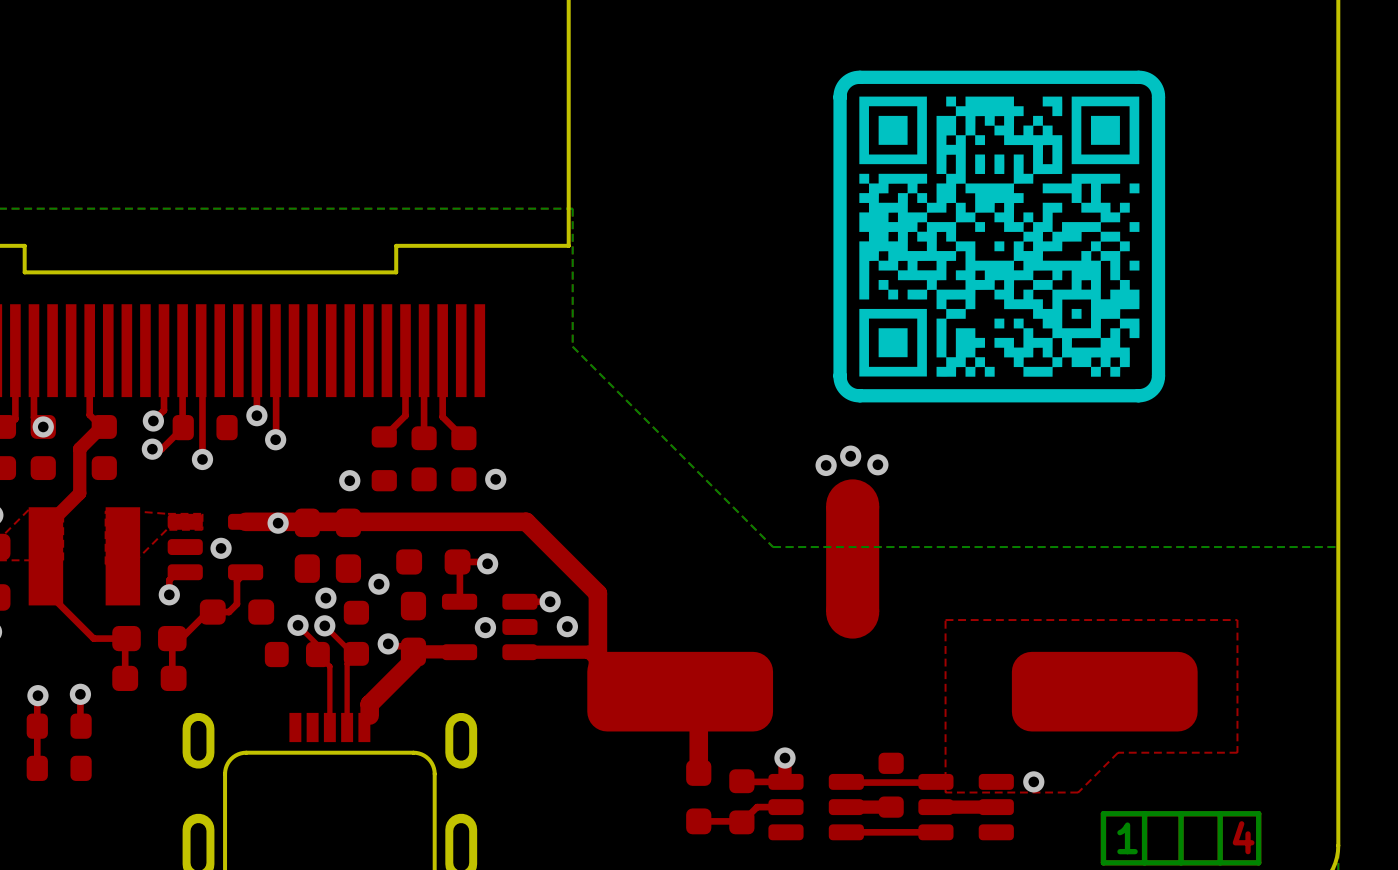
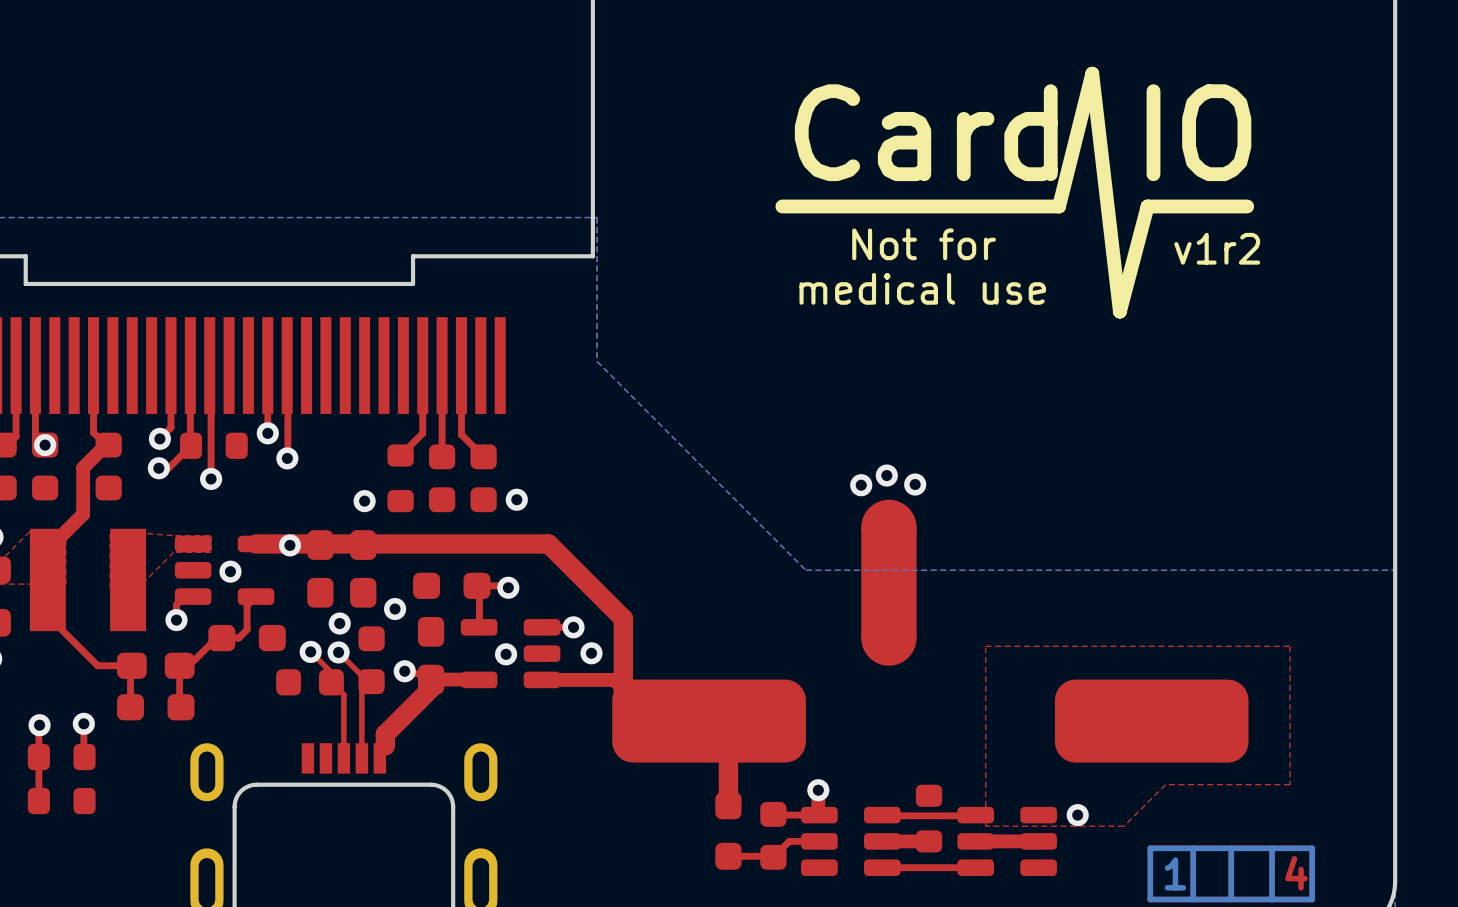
drawing: none -> [775, 66, 1255, 319]
drawing: [833, 70, 1166, 403] -> none
text: none -> Not for (924, 244)
text: none -> v1r2 (1217, 248)
text: none -> medical use (922, 288)

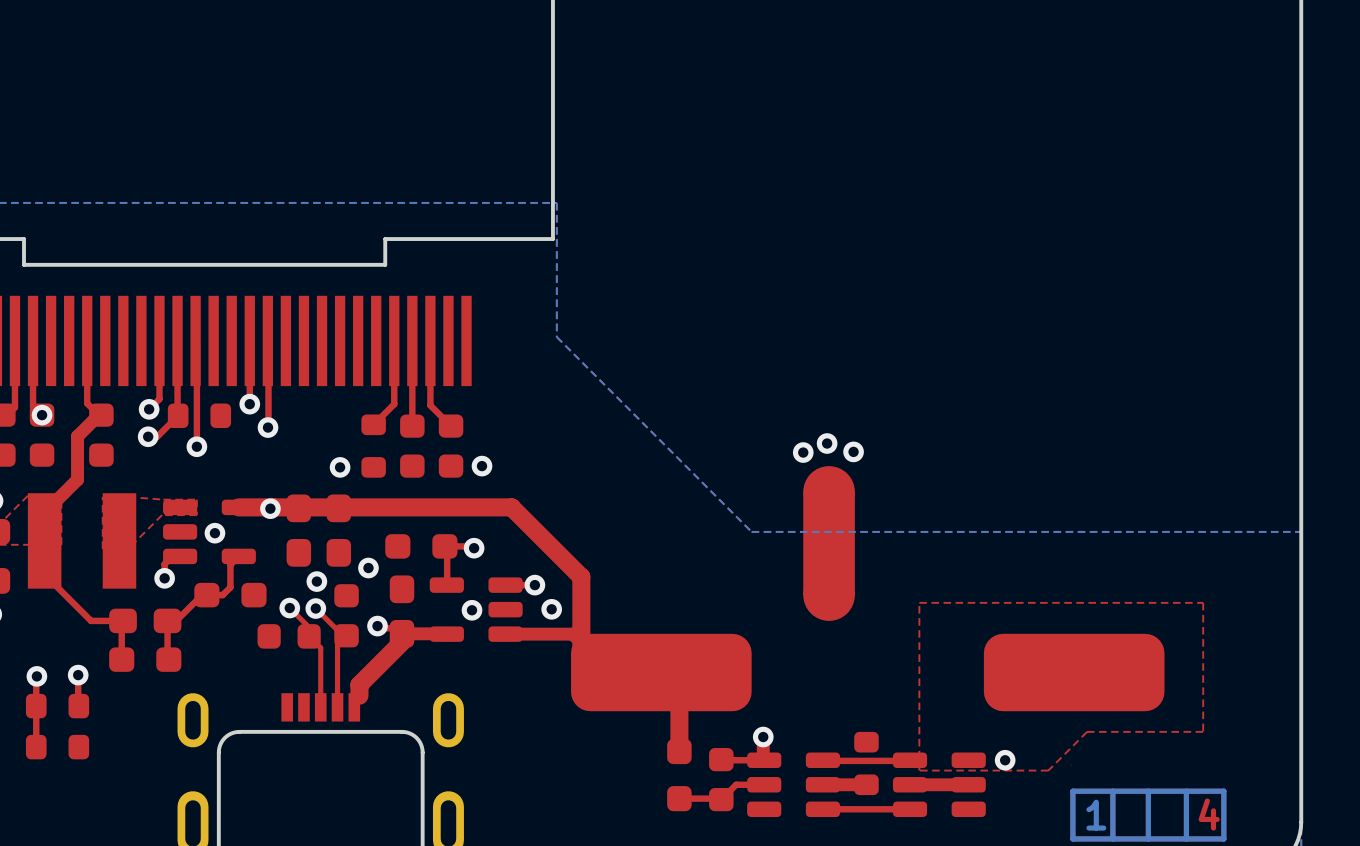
drawing: [775, 66, 1255, 319] -> none
text: Not for (924, 244) -> none
text: v1r2 (1217, 248) -> none
text: medical use (922, 288) -> none

